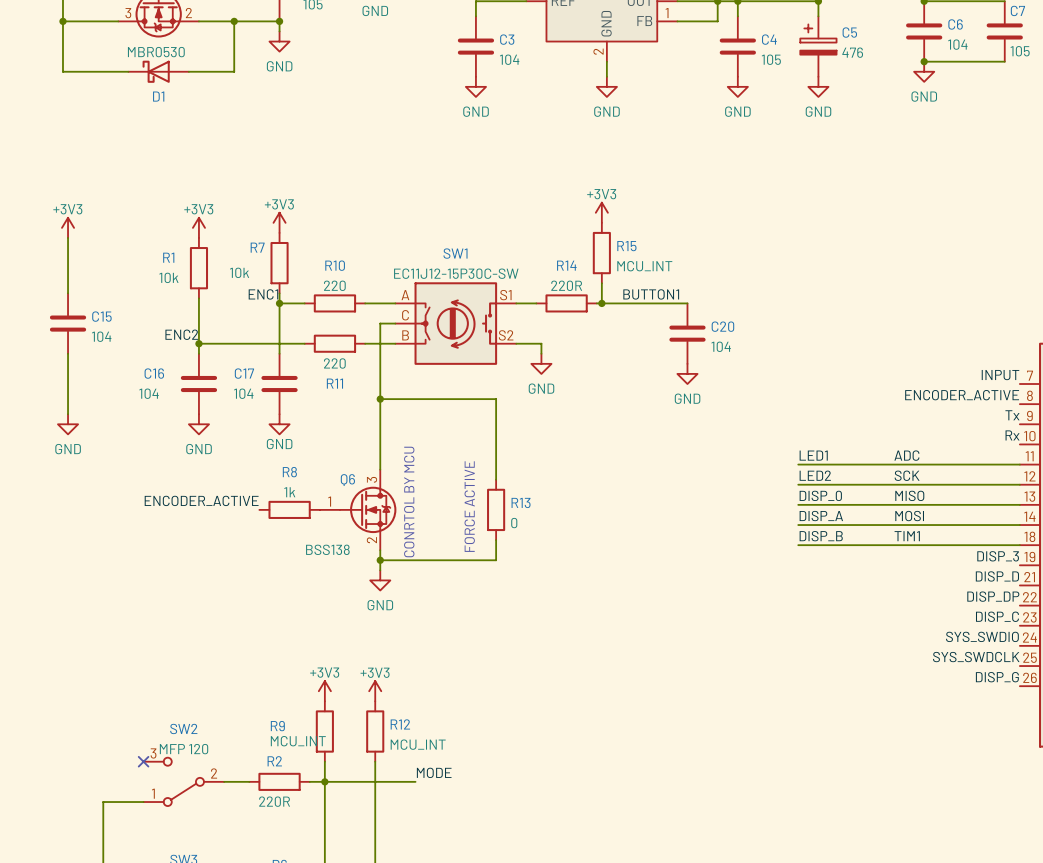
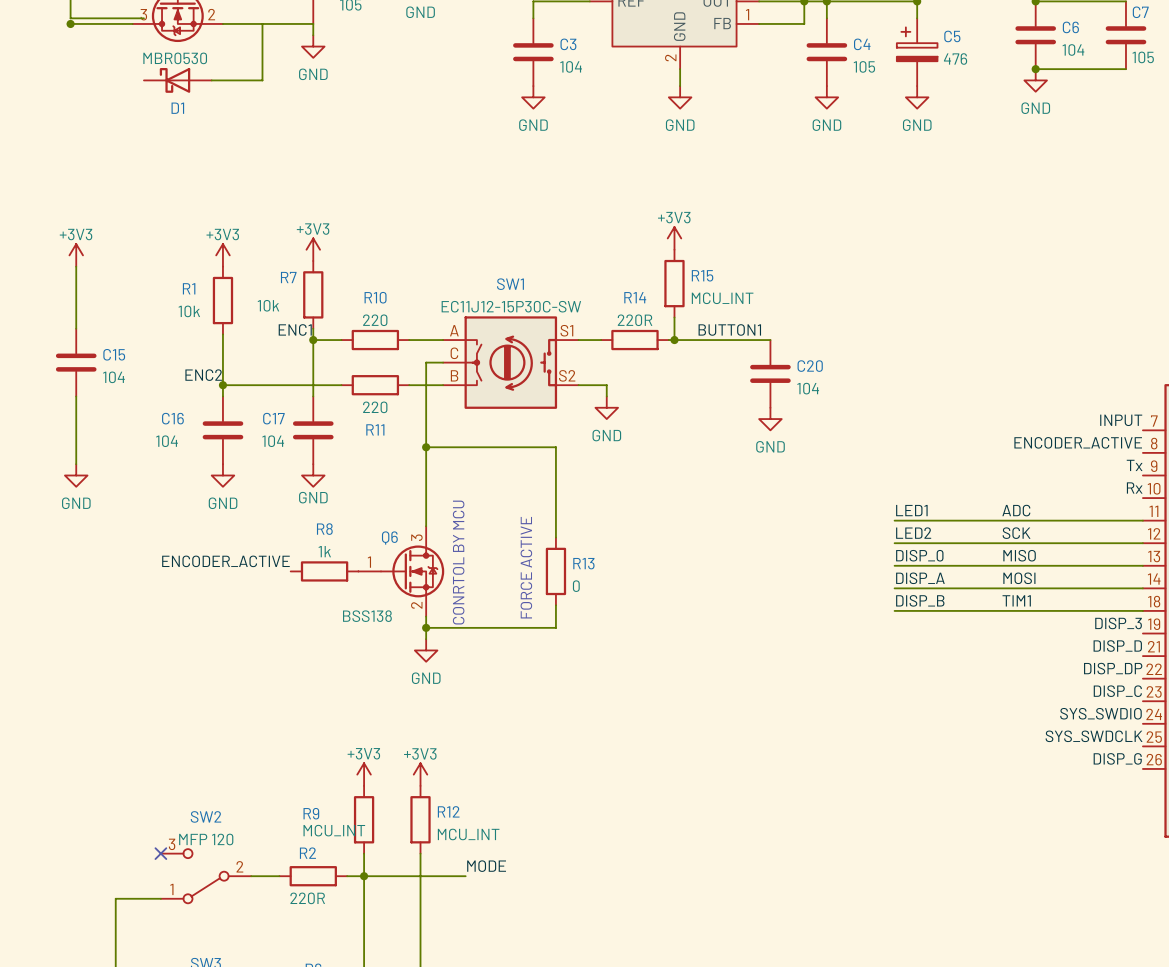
wire: (62, 16) (62, 71) (128, 71) -> (70, 18) (143, 18)
junction: (234, 21) -> none
junction: (279, 21) -> none

